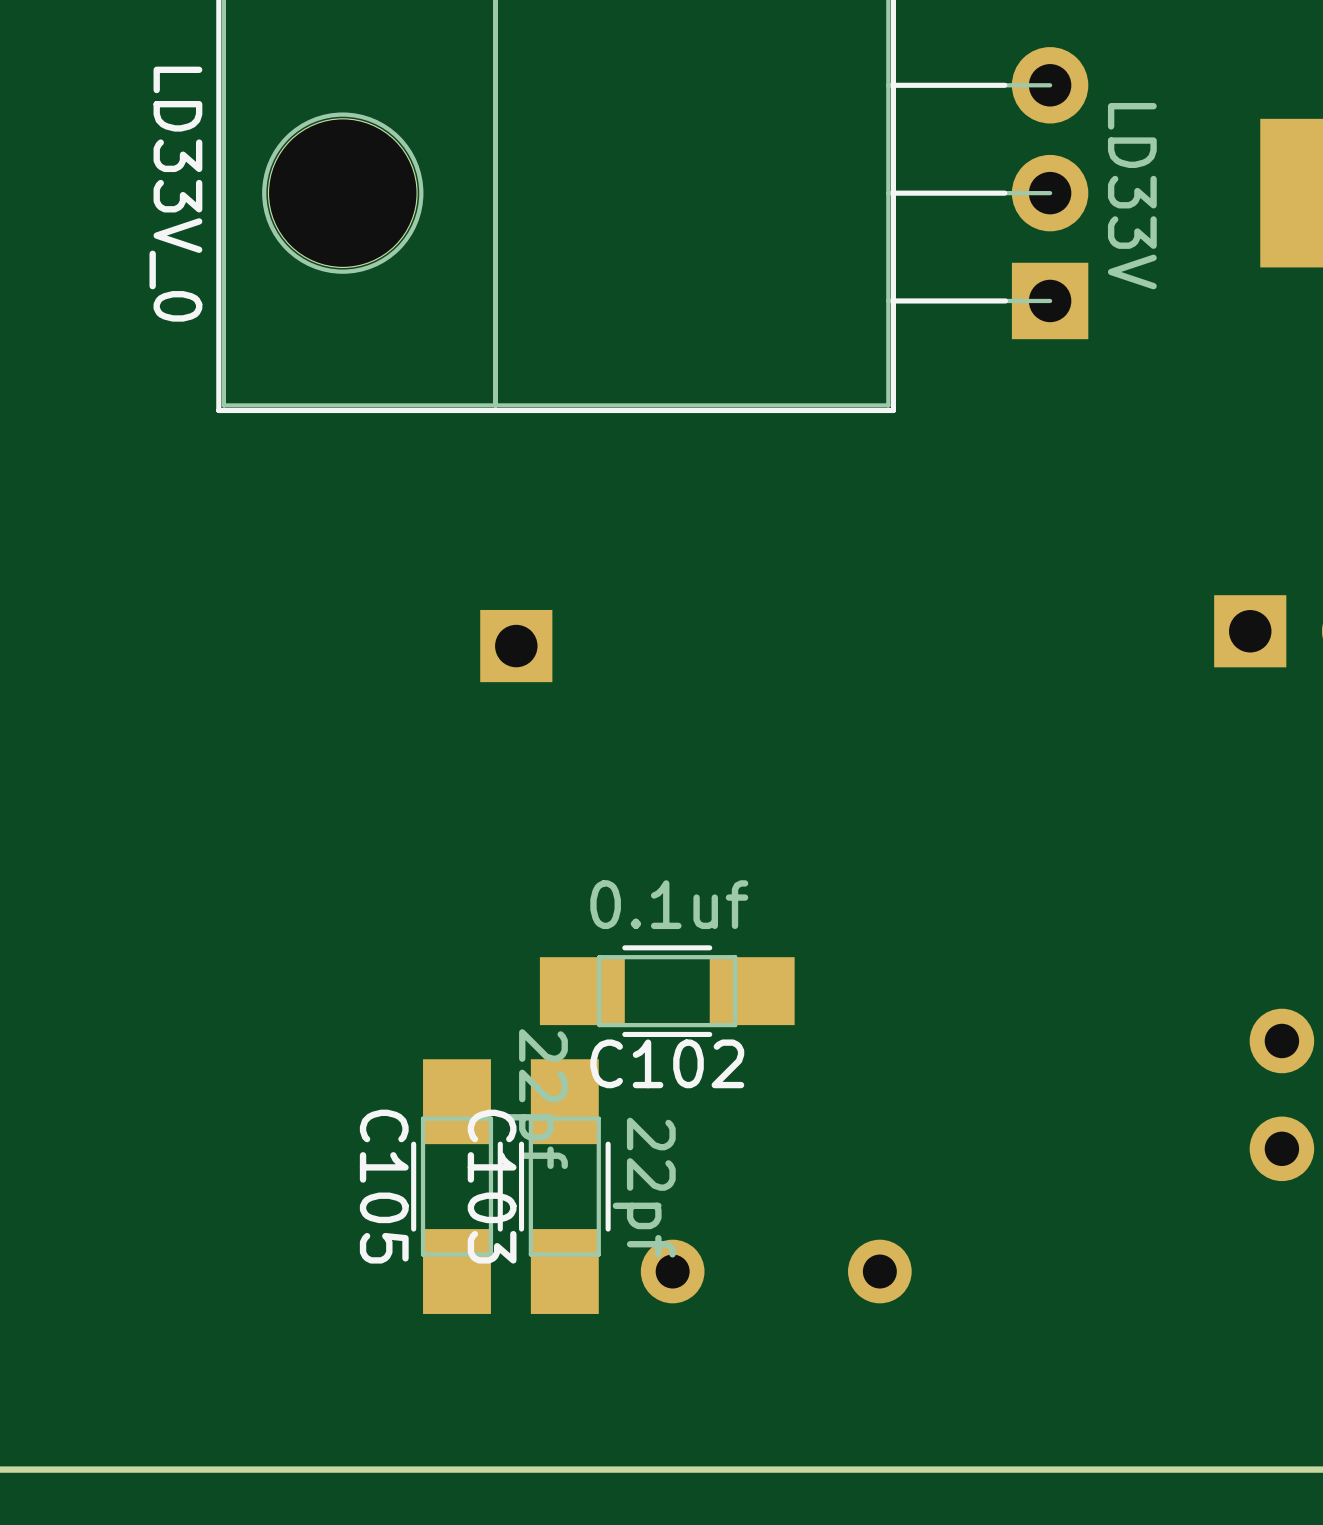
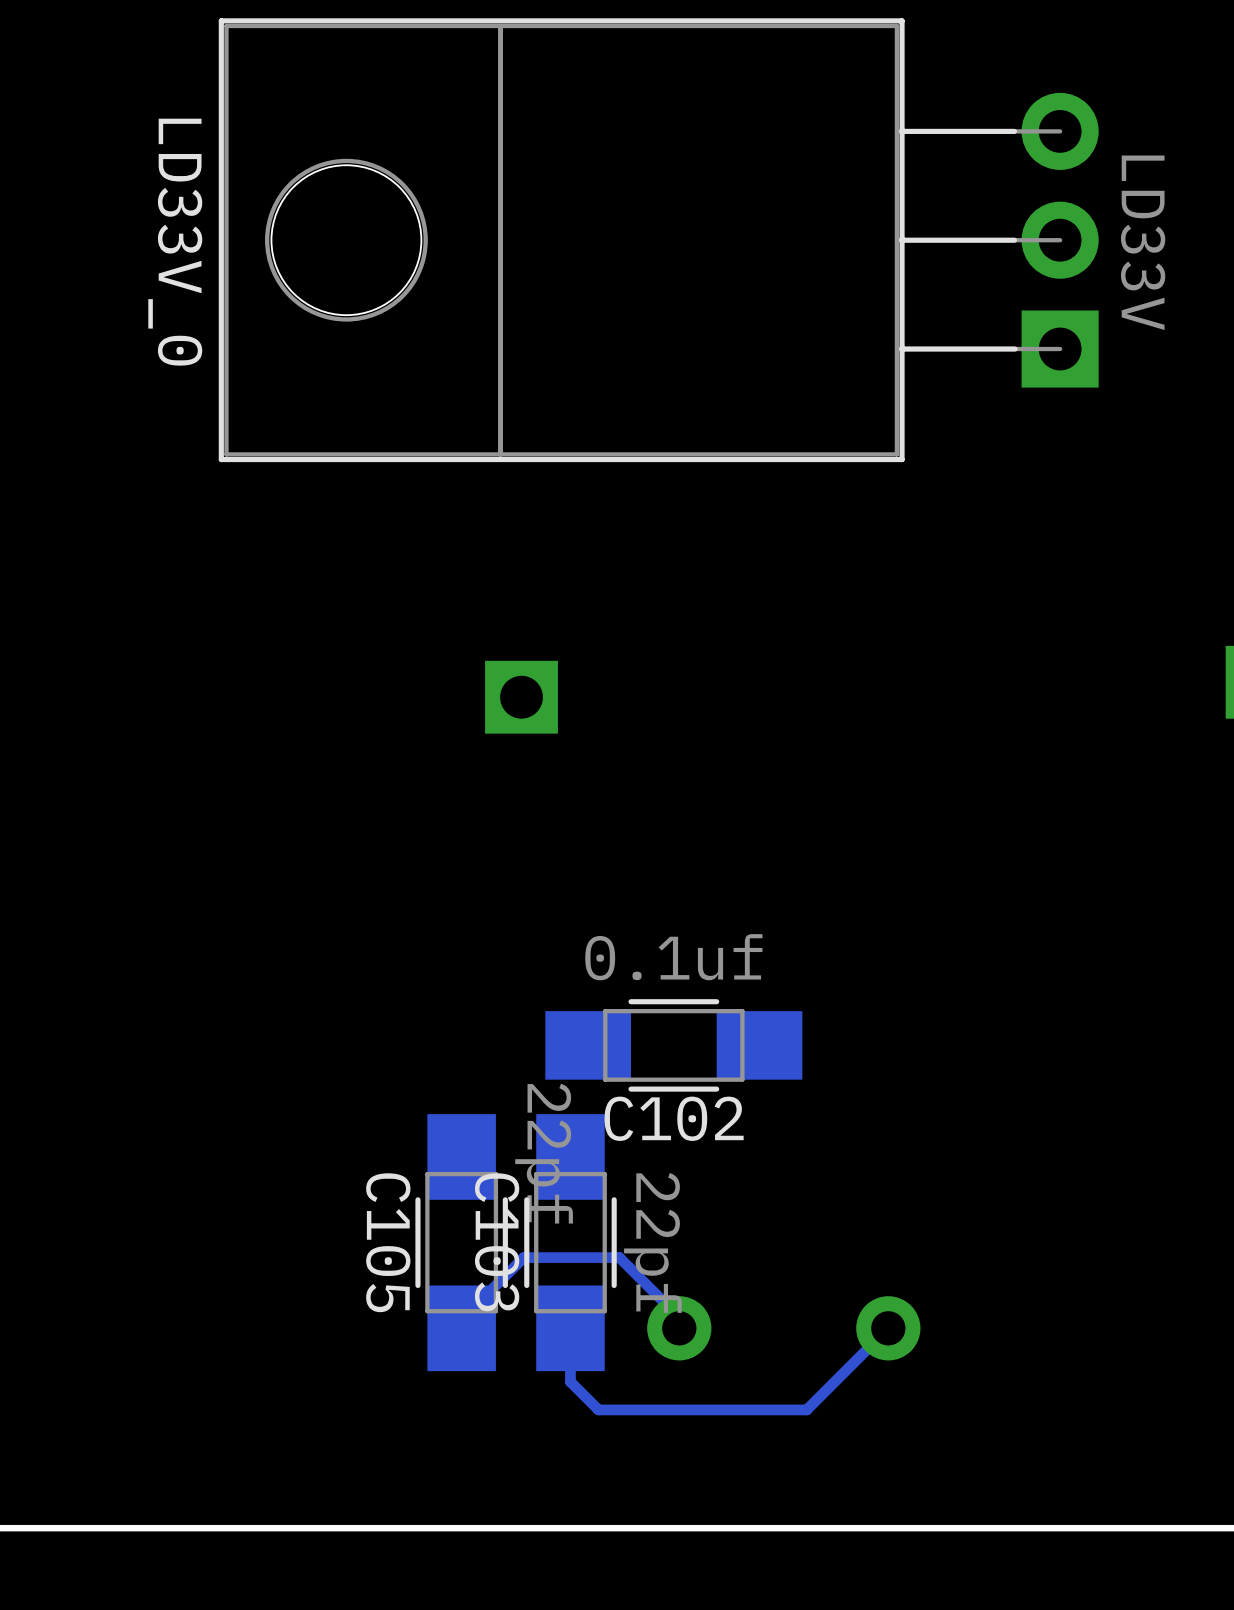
track: none -> (679, 1328) (679, 1317) (619, 1257) (523, 1257) (461, 1319) (461, 1328)
track: none -> (888, 1328) (806, 1409) (598, 1409) (570, 1381) (570, 1328)

